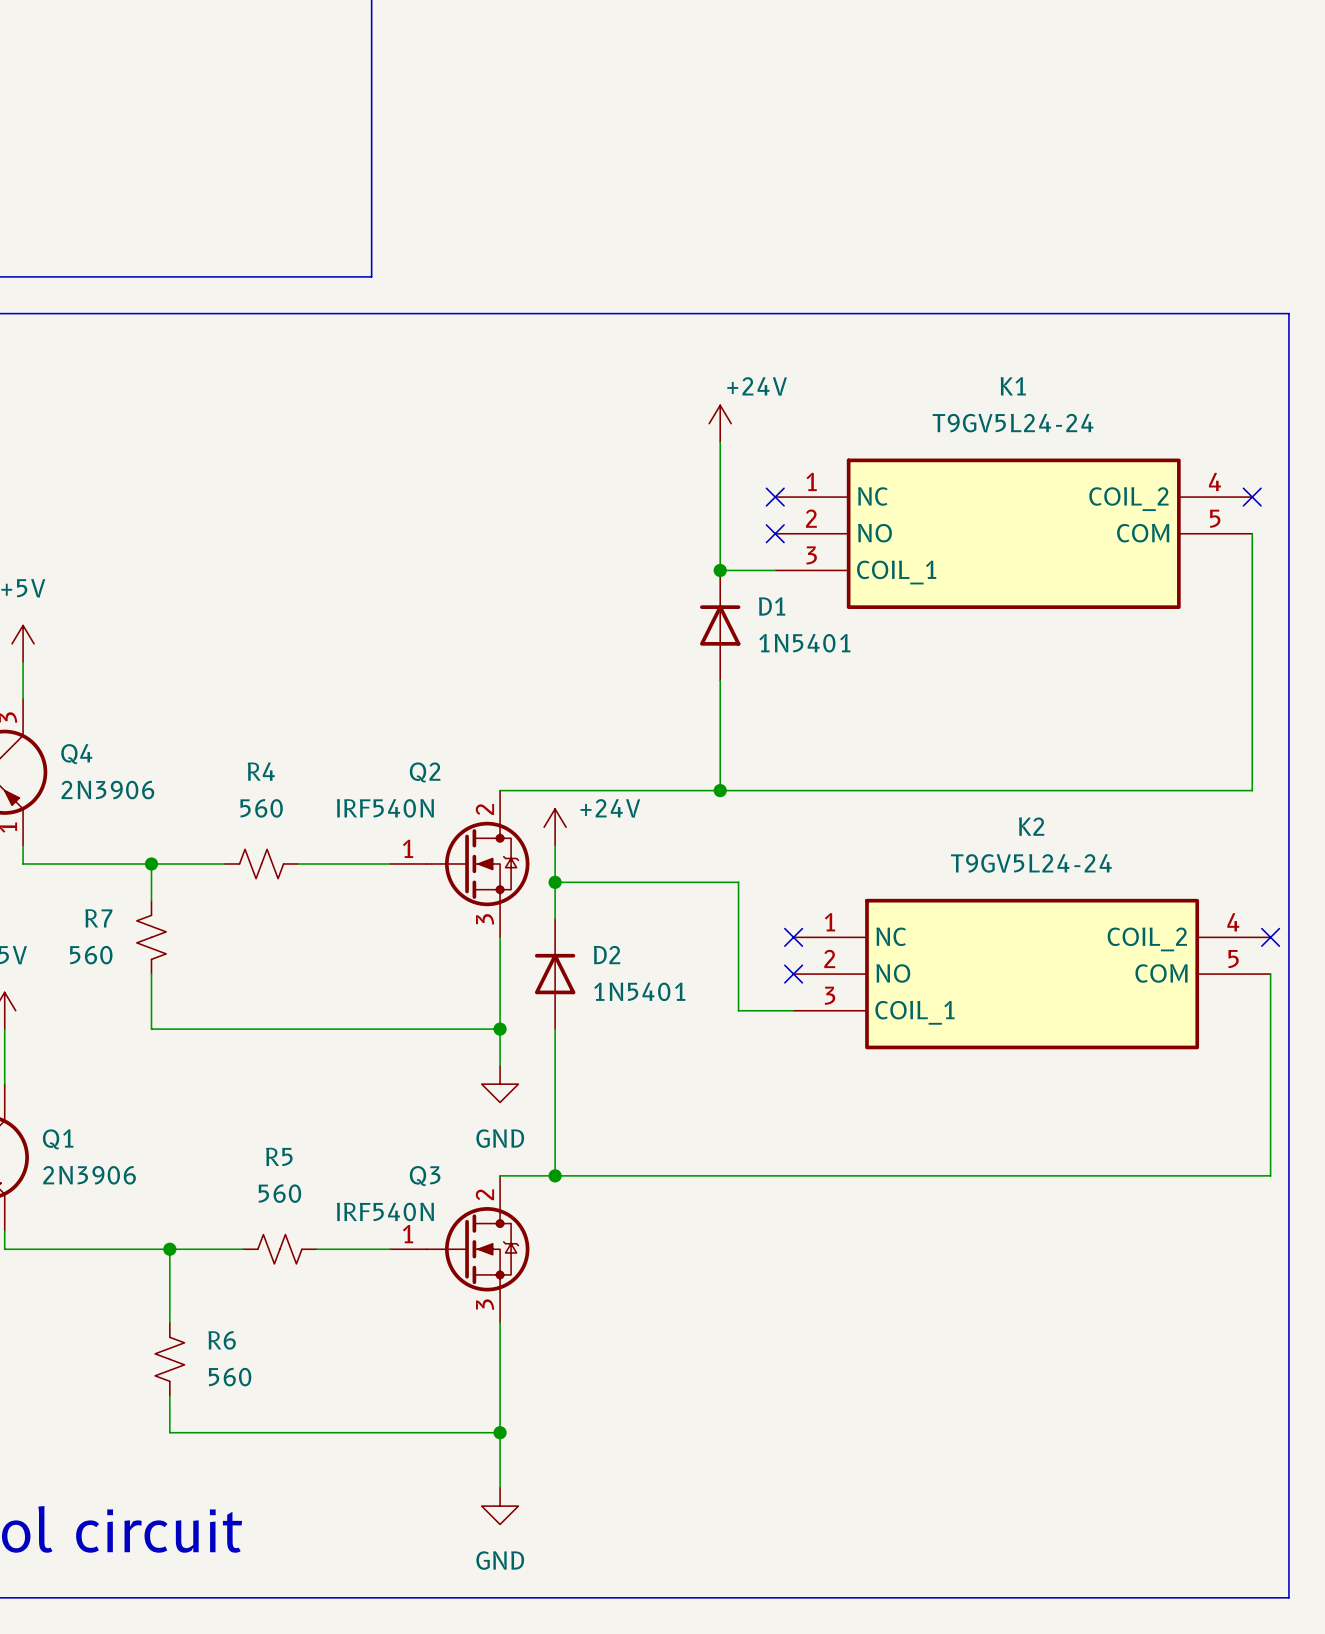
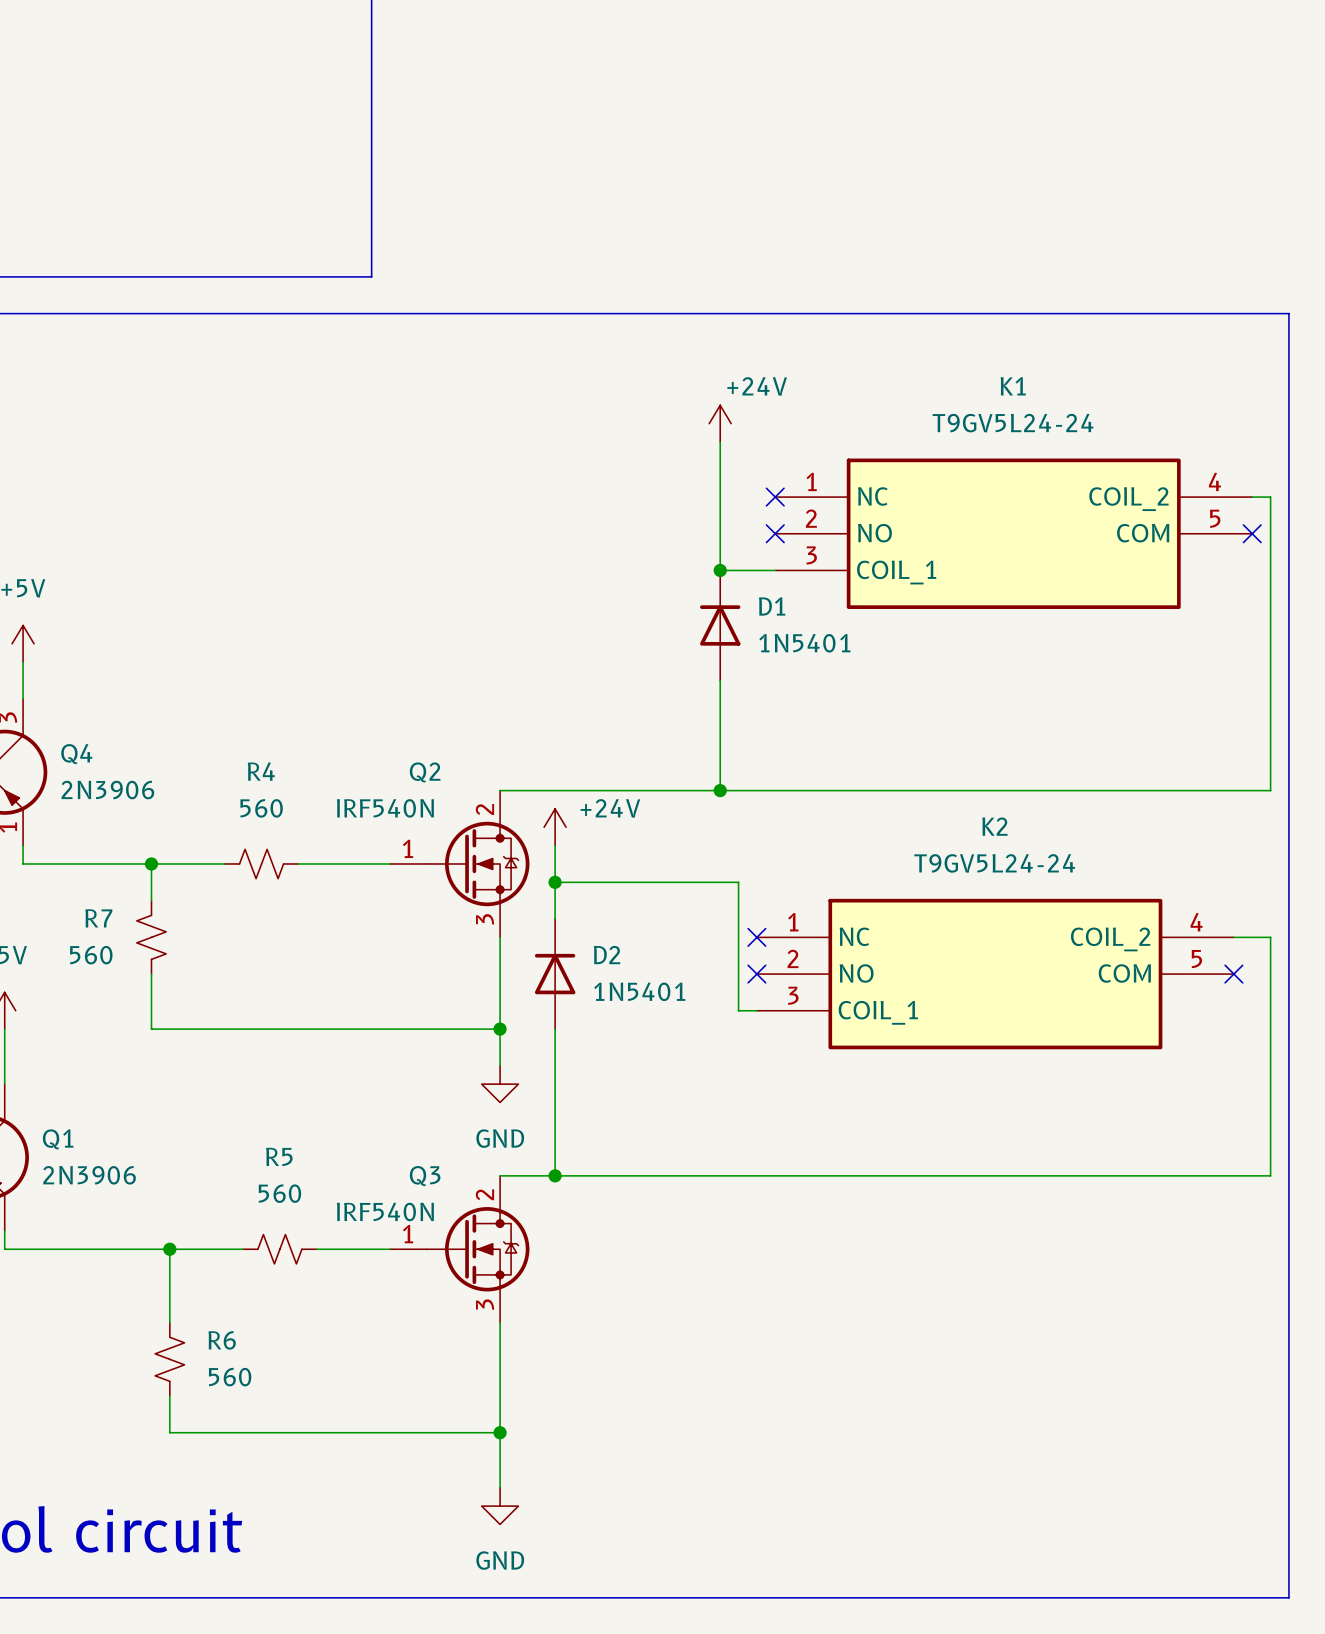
no-connect mark position: (1252, 497) -> (1252, 533)
wire: (1252, 533) (1252, 790) -> (1252, 497) (1270, 497) (1270, 790) (1252, 790)
no-connect mark: none -> (756, 937)
no-connect mark: (793, 937) -> none
wire: none -> (1233, 937) (1270, 937) (1270, 974)
no-connect mark position: (1270, 937) -> (1233, 974)
no-connect mark: none -> (756, 974)
no-connect mark: (793, 974) -> none
K2 position: (1032, 974) -> (995, 974)

